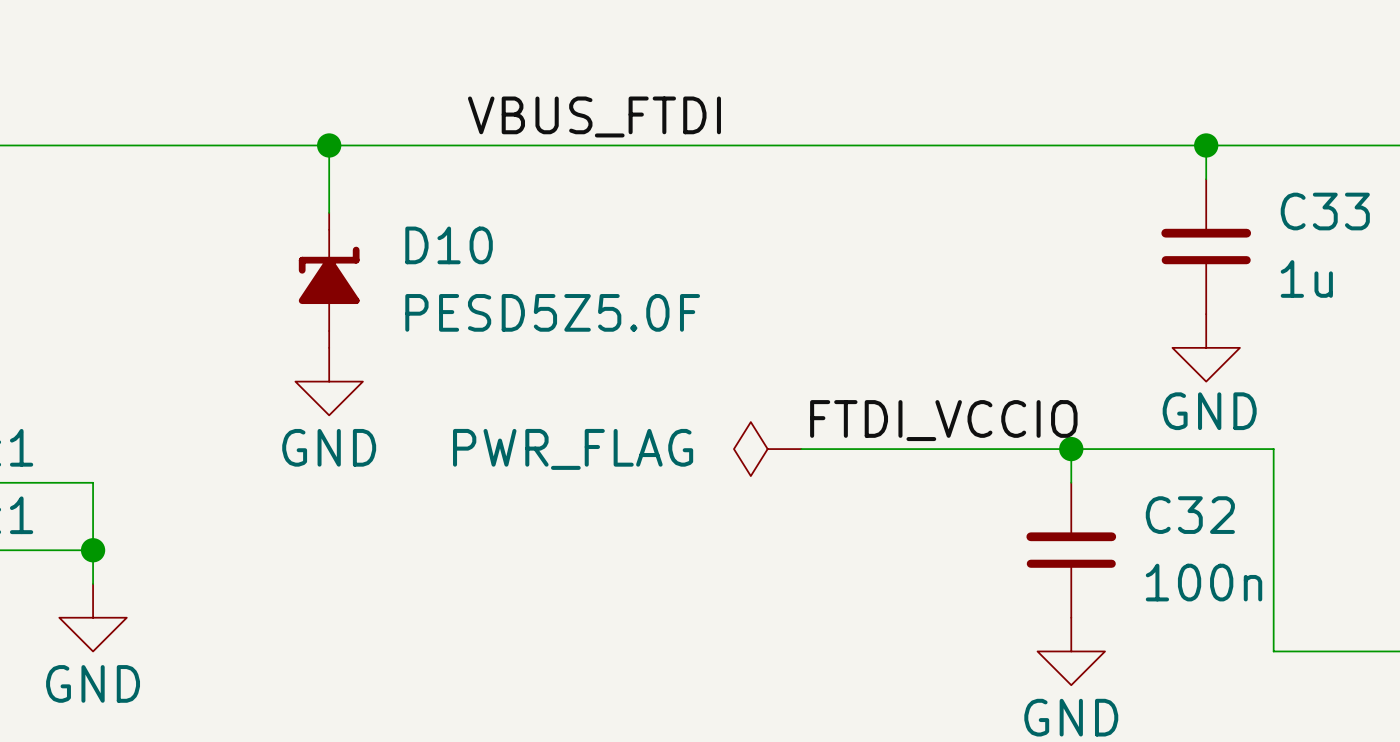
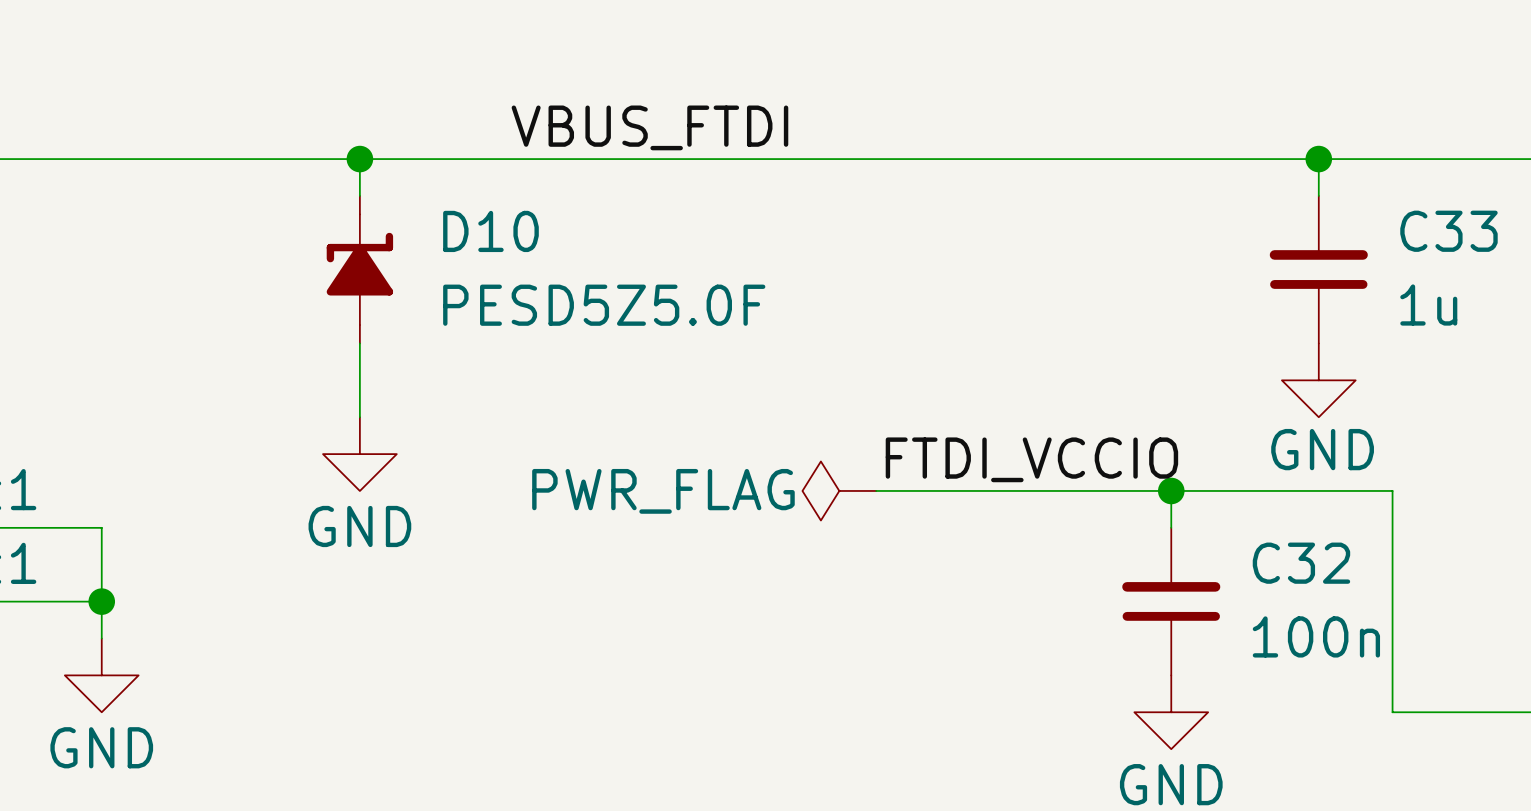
D10 position: (329, 280) -> (359, 269)
power symbol position: GND (329, 381) -> GND (359, 454)
power symbol text position: PWR_FLAG (573, 449) -> PWR_FLAG (663, 491)

